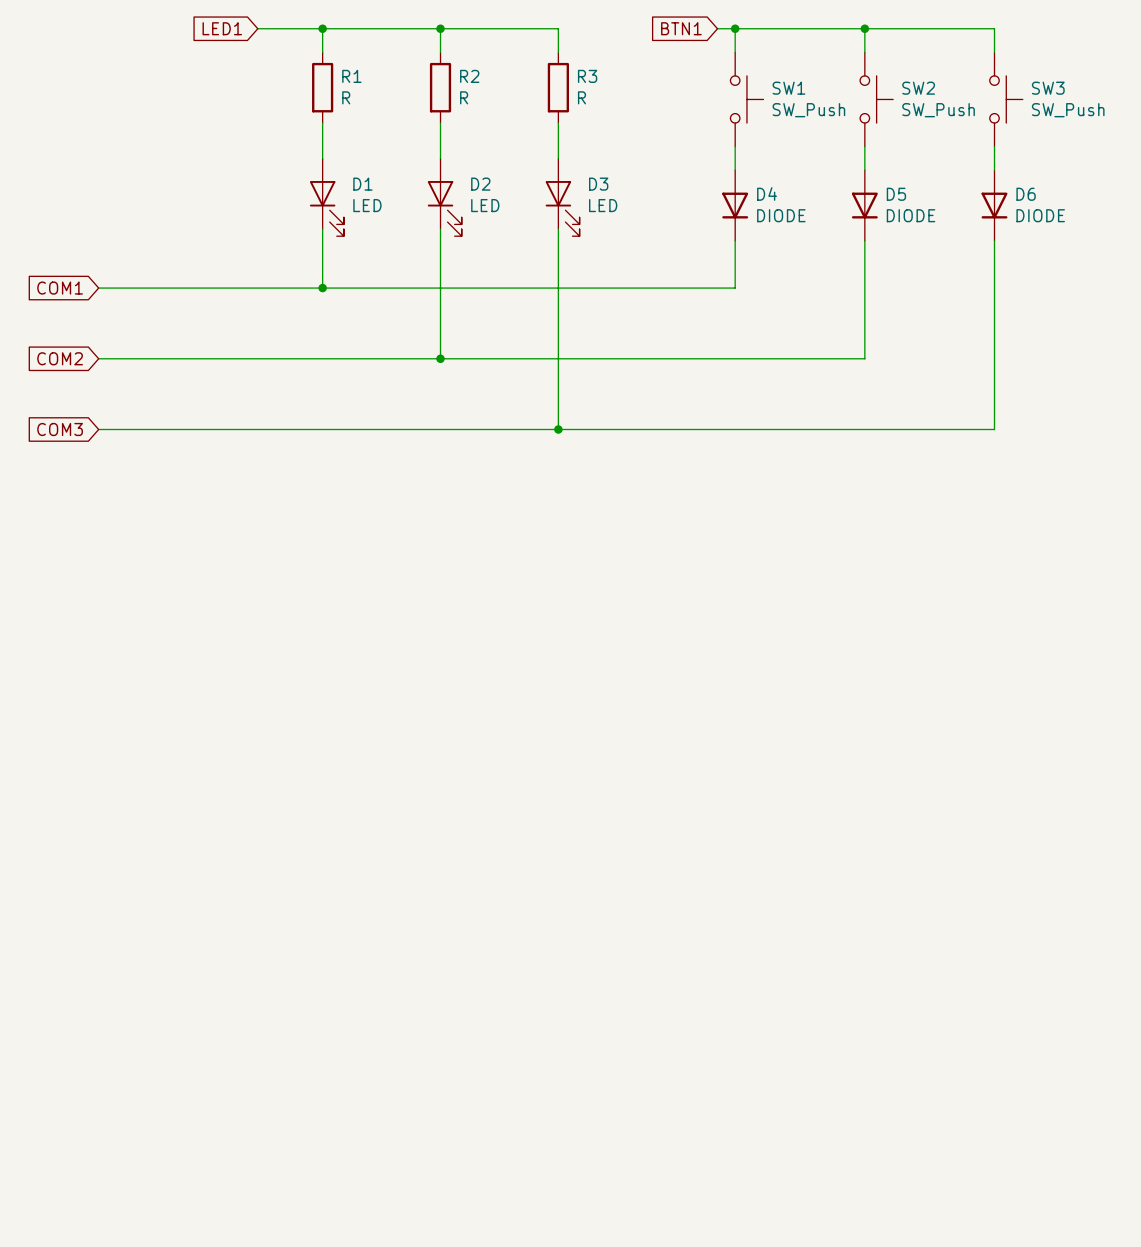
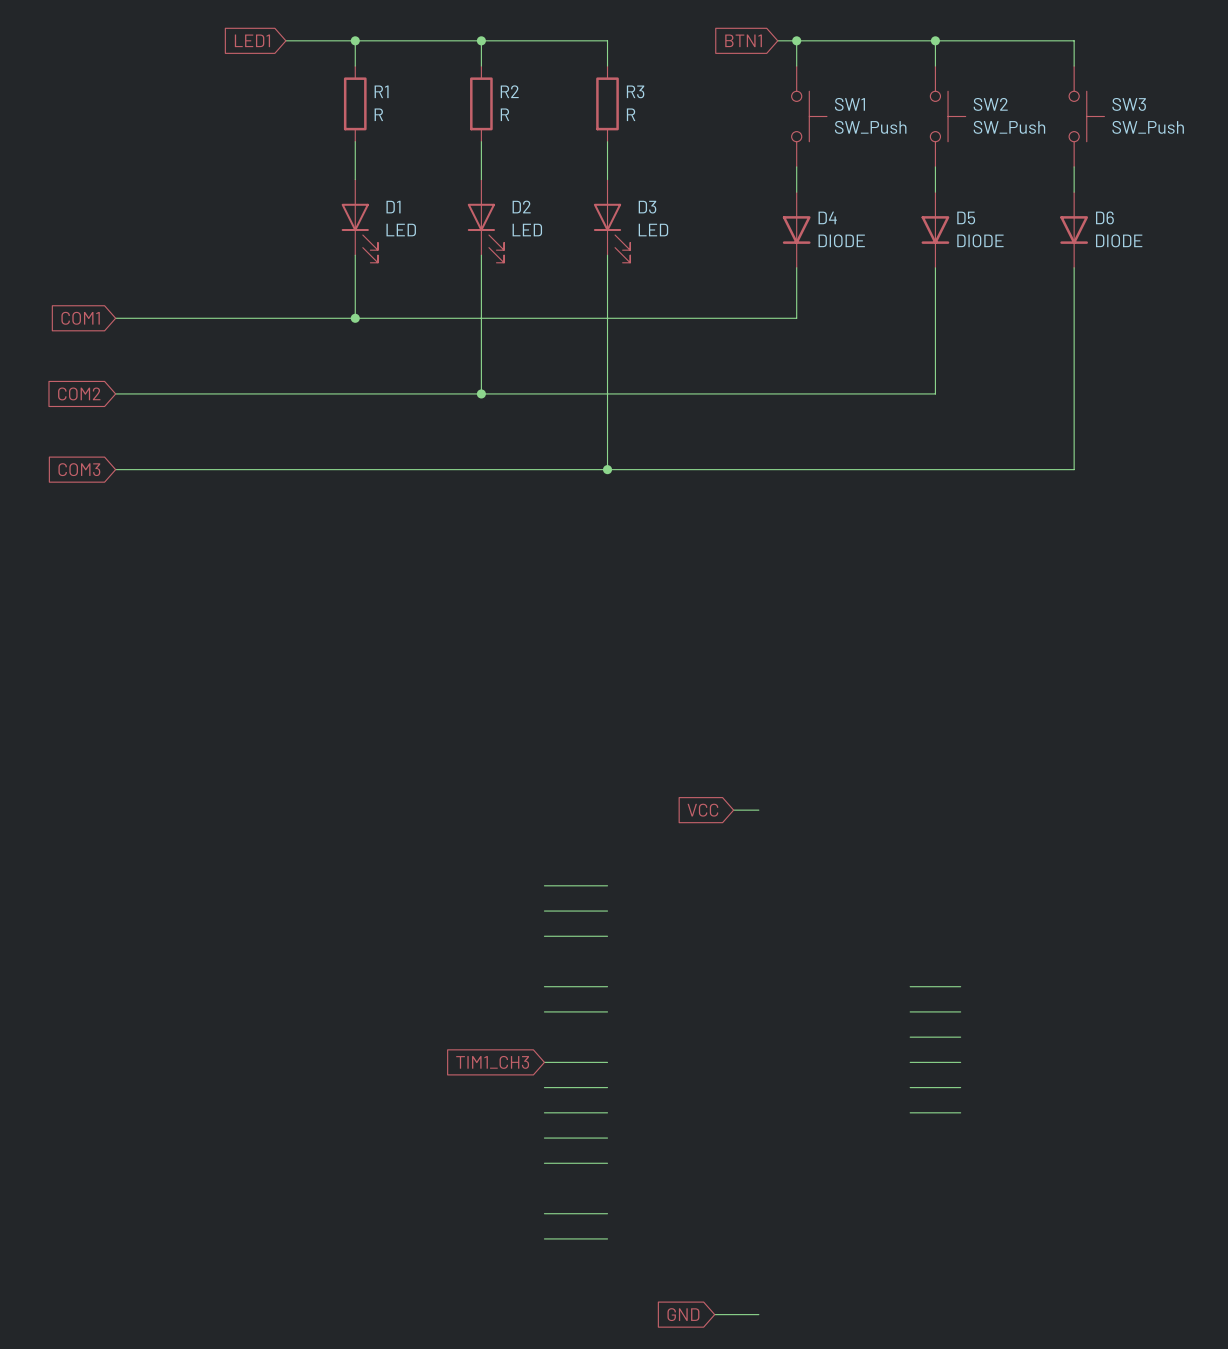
global label: none -> VCC (702, 810)
wire: none -> (733, 810) (758, 810)
wire: none -> (544, 885) (607, 885)
wire: none -> (544, 911) (607, 911)
wire: none -> (544, 936) (607, 936)
wire: none -> (544, 986) (607, 986)
wire: none -> (910, 986) (960, 986)
wire: none -> (544, 1011) (607, 1011)
wire: none -> (910, 1011) (960, 1011)
wire: none -> (910, 1037) (960, 1037)
wire: none -> (544, 1062) (607, 1062)
wire: none -> (910, 1062) (960, 1062)
global label: none -> TIM1_CH3 (492, 1062)
wire: none -> (544, 1087) (607, 1087)
wire: none -> (910, 1087) (960, 1087)
wire: none -> (544, 1112) (607, 1112)
wire: none -> (910, 1112) (960, 1112)
wire: none -> (544, 1138) (607, 1138)
wire: none -> (544, 1163) (607, 1163)
wire: none -> (544, 1213) (607, 1213)
wire: none -> (544, 1238) (607, 1238)
global label: none -> GND (683, 1314)
wire: none -> (714, 1314) (758, 1314)

